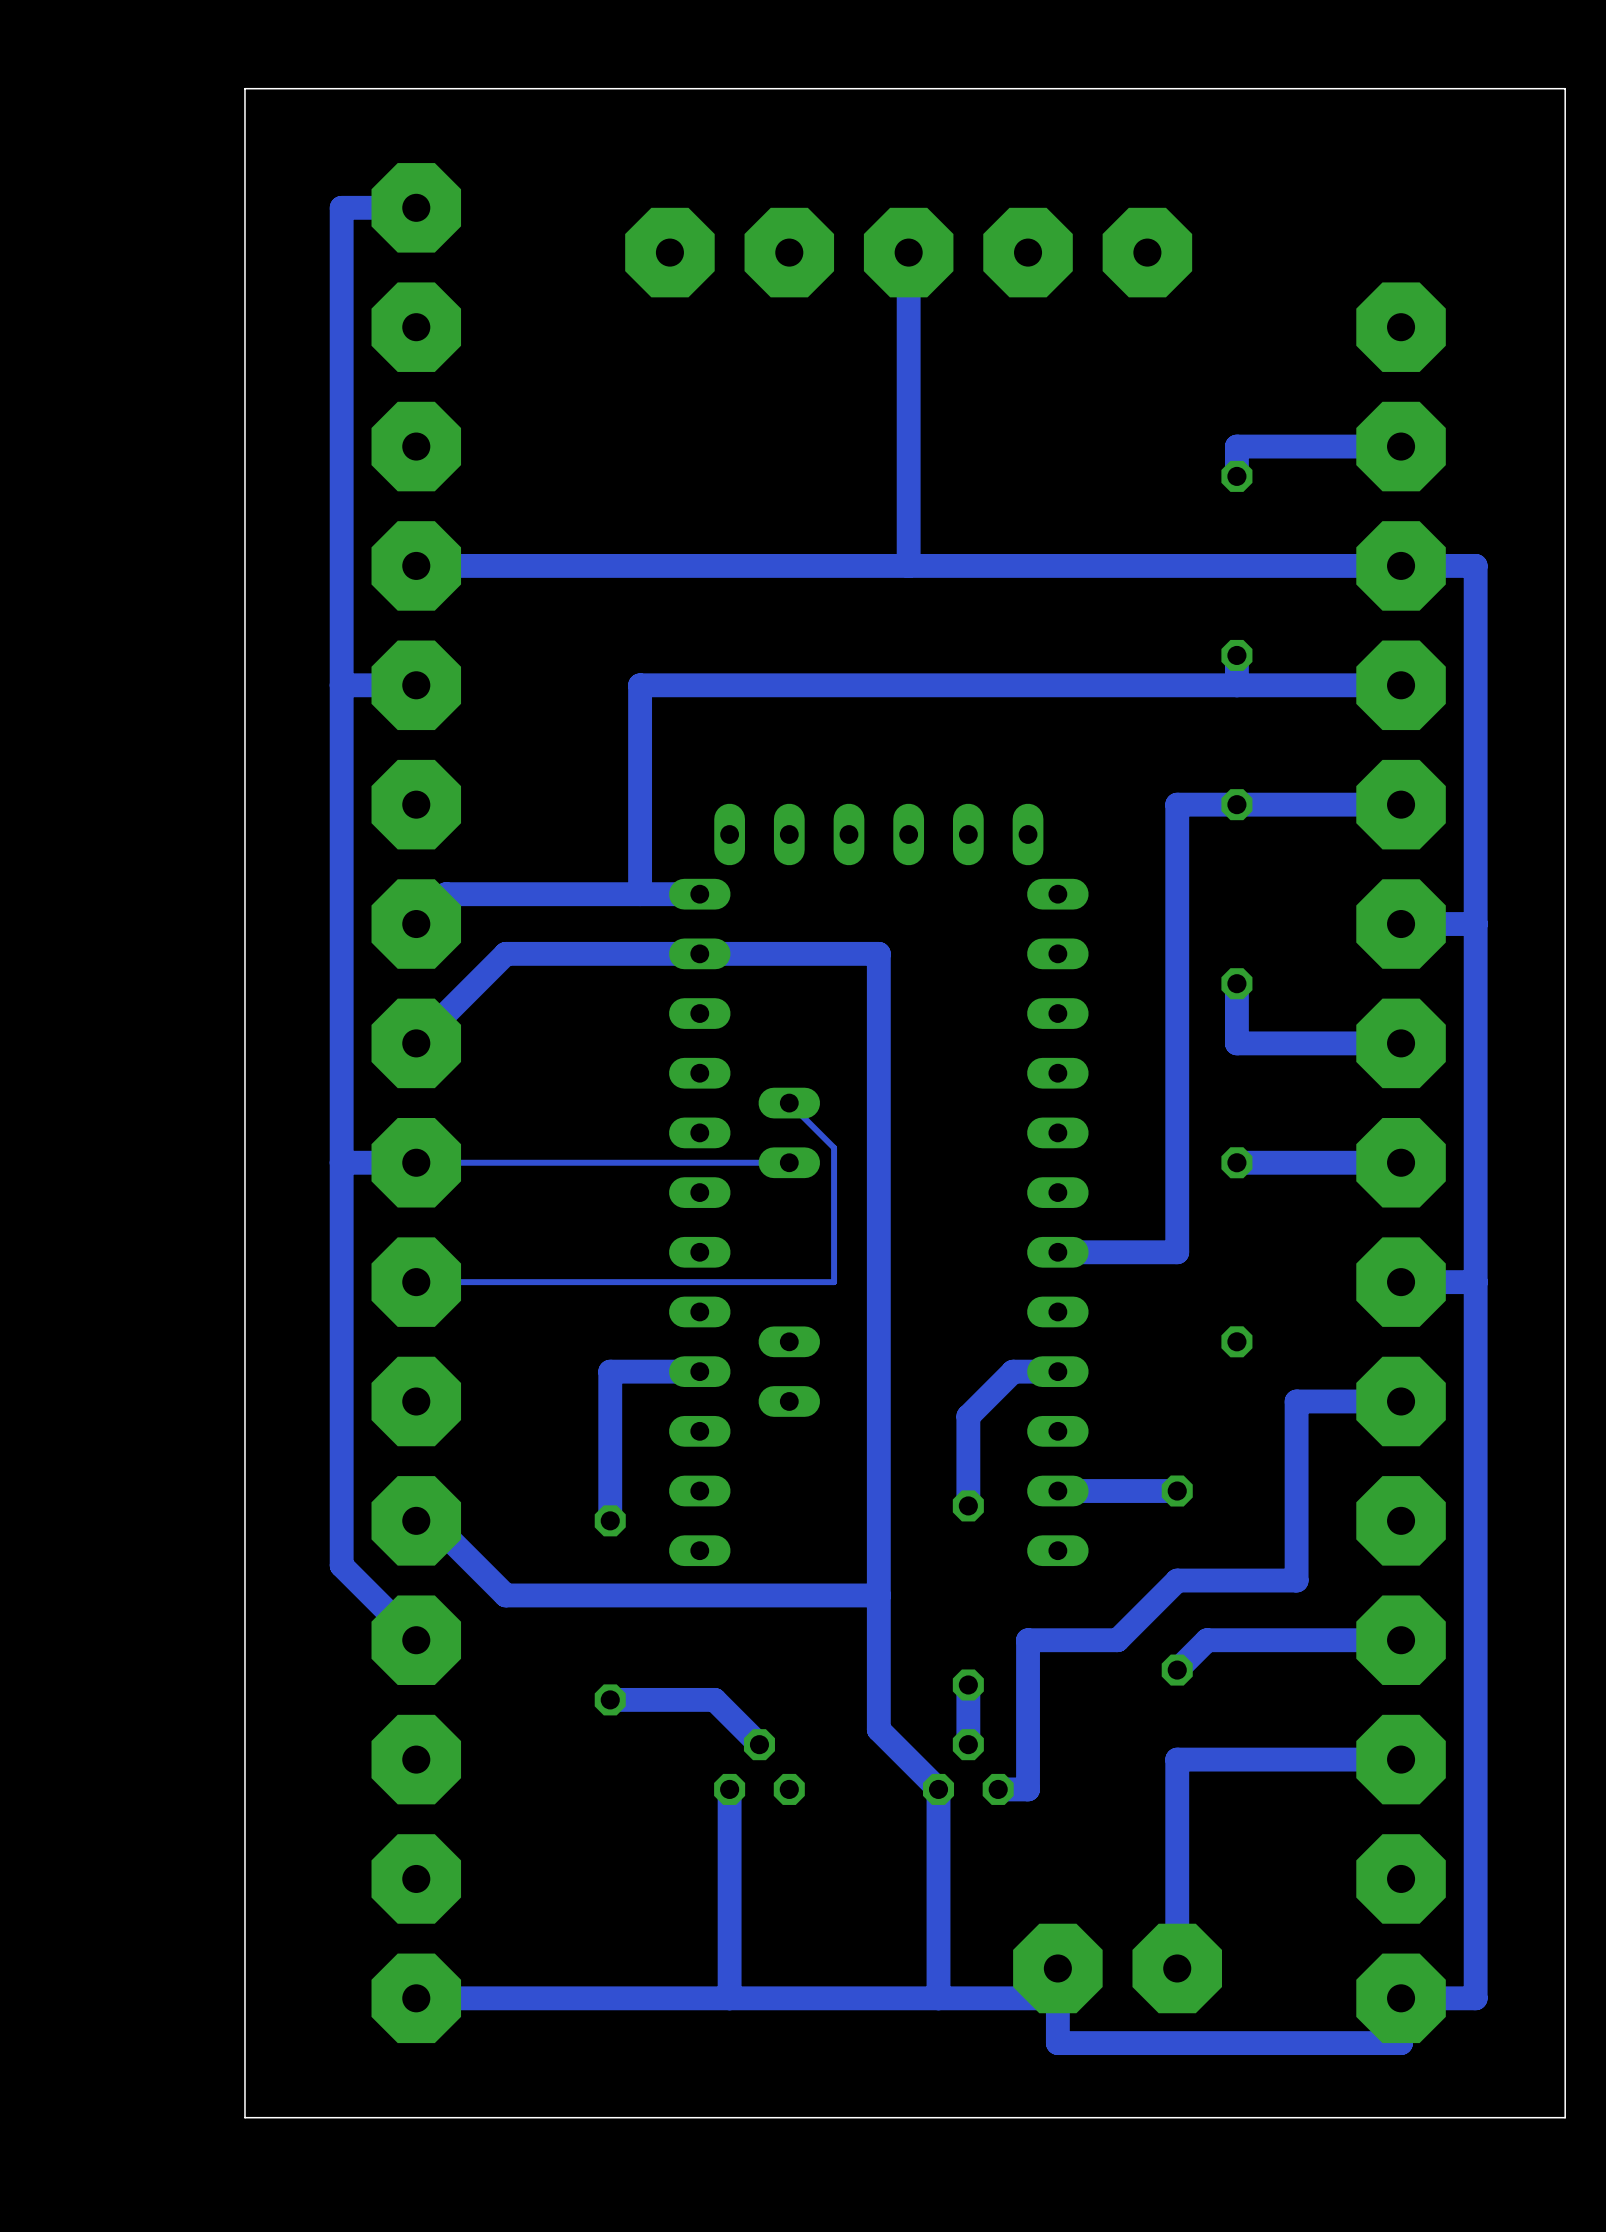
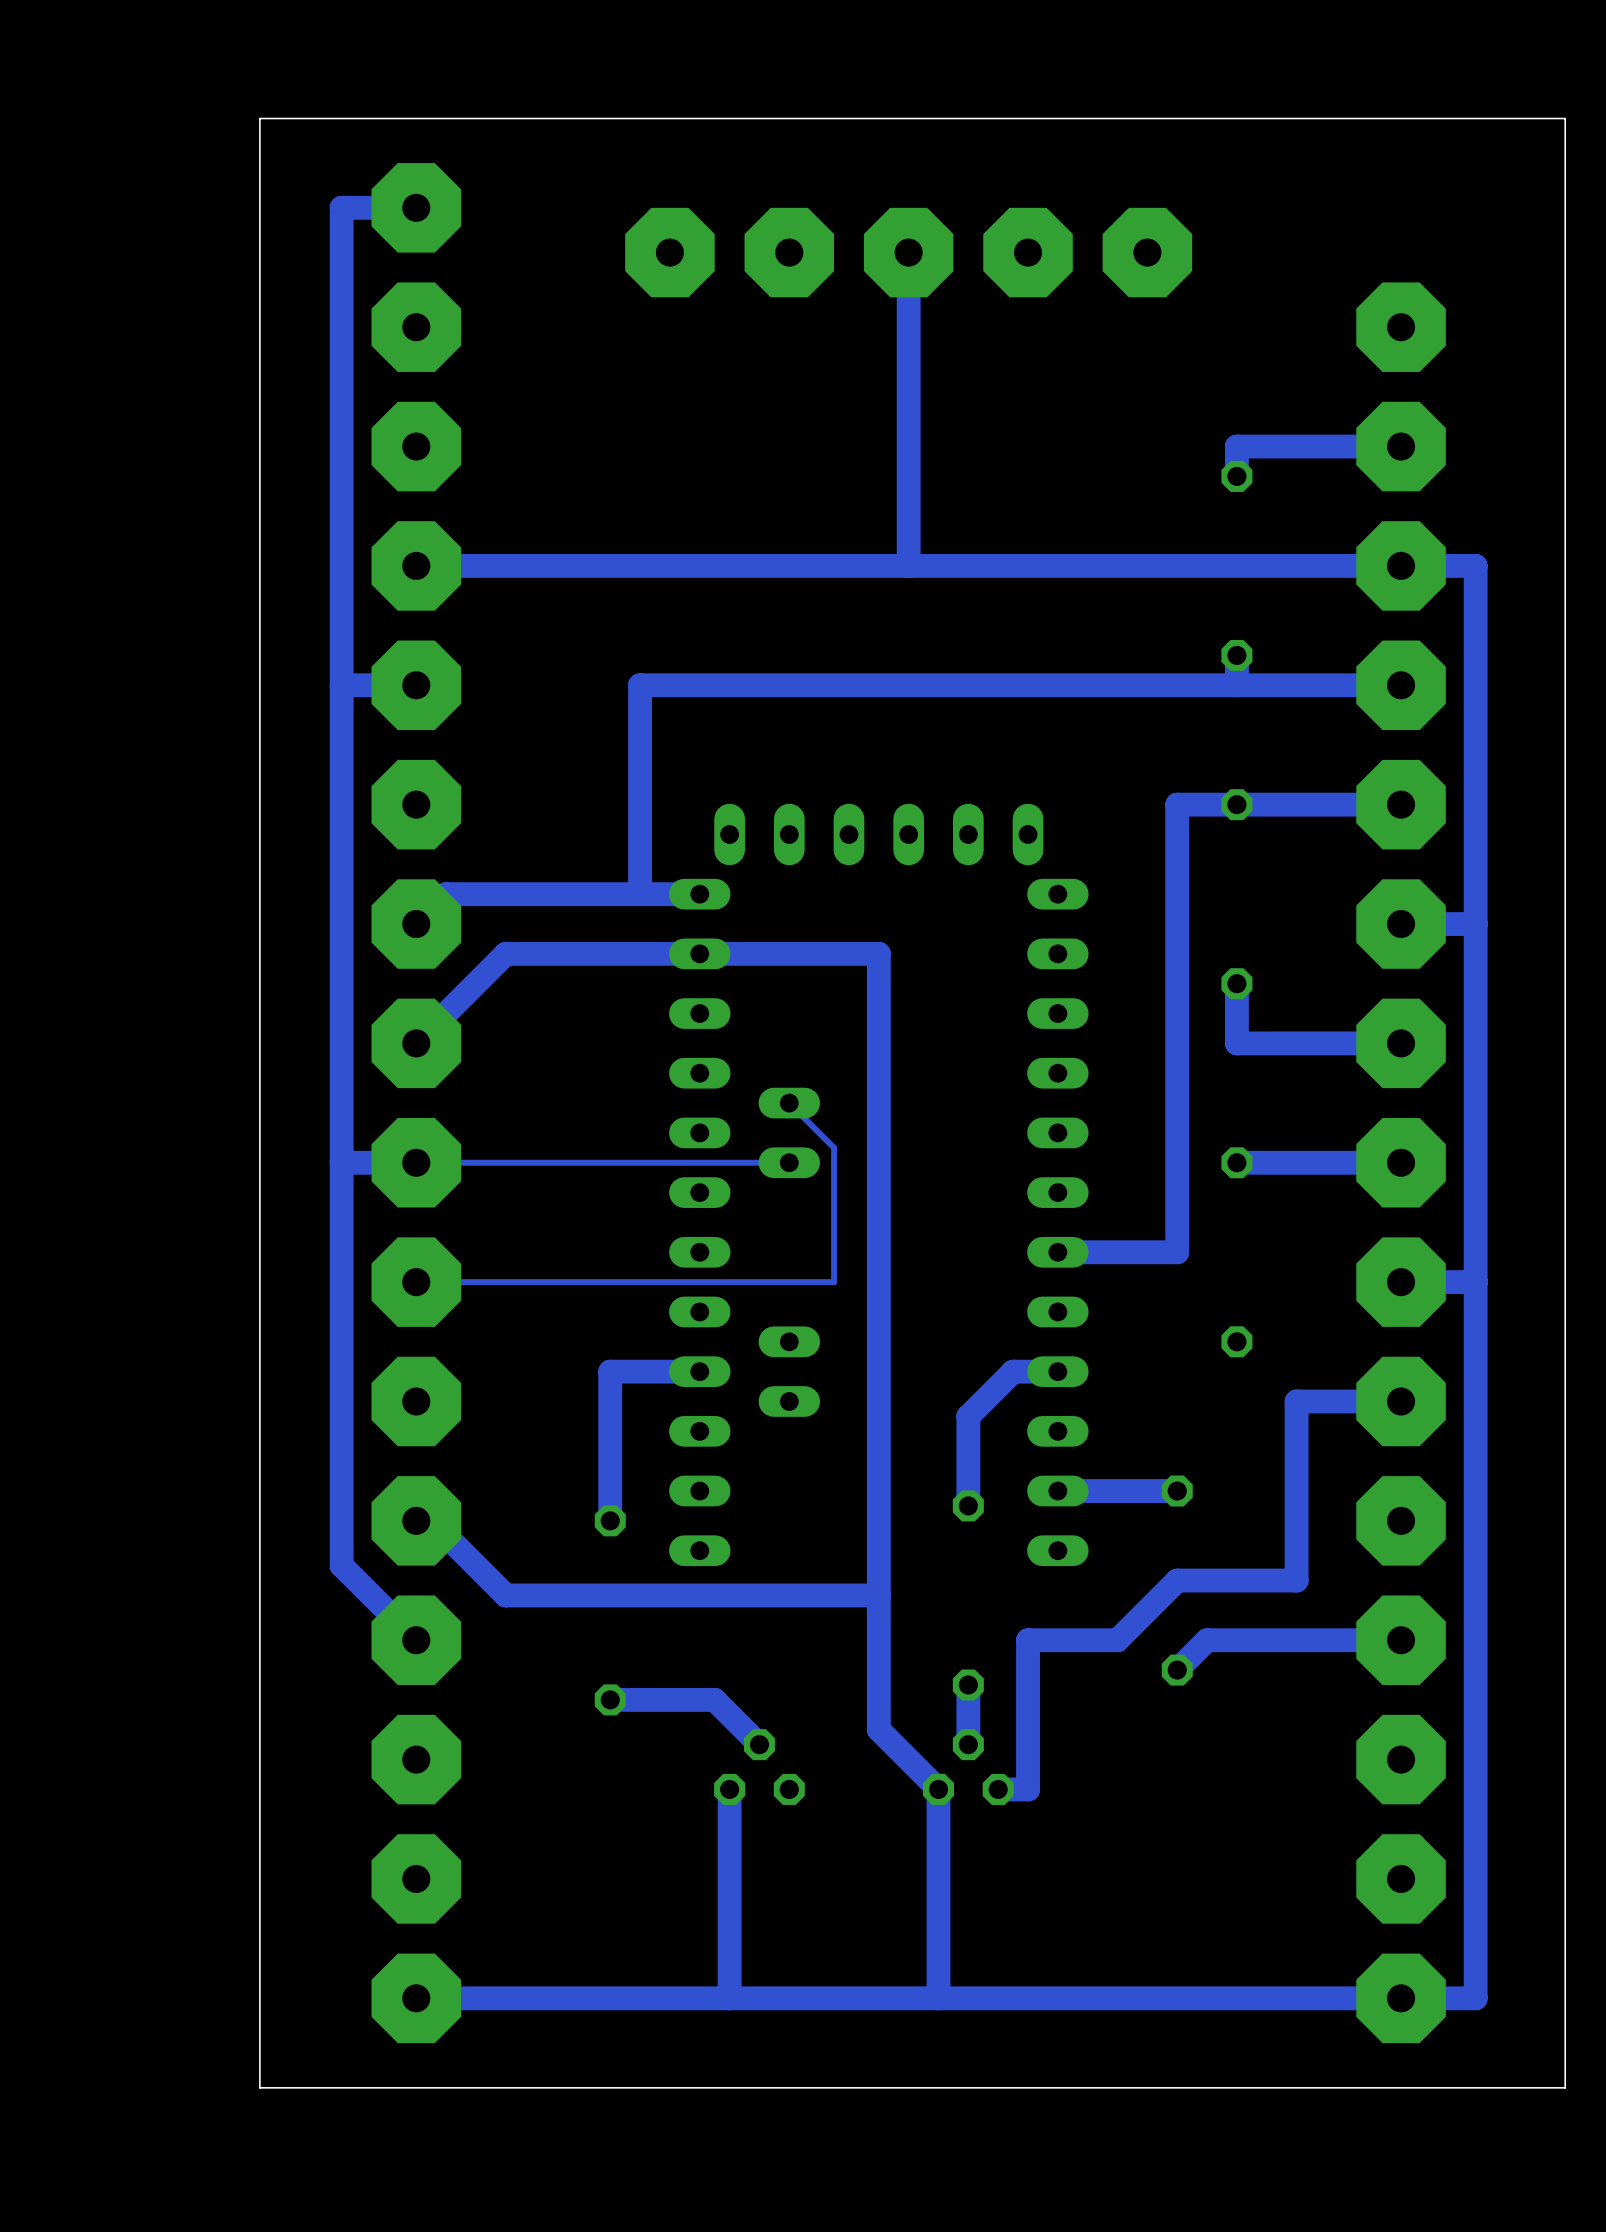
board edge: (1565, 118) (1565, 88) (244, 88) (244, 2117) (1565, 2117) (1565, 2087) -> (1565, 118) (259, 118) (259, 2087) (1565, 2087)
track: (1401, 1759) (1177, 1759) (1177, 1968) -> none
track: (1057, 1968) (1057, 2043) (1401, 2043) (1401, 1998) -> (1057, 1998) (1401, 1998)
part: (1117, 1968) -> none

